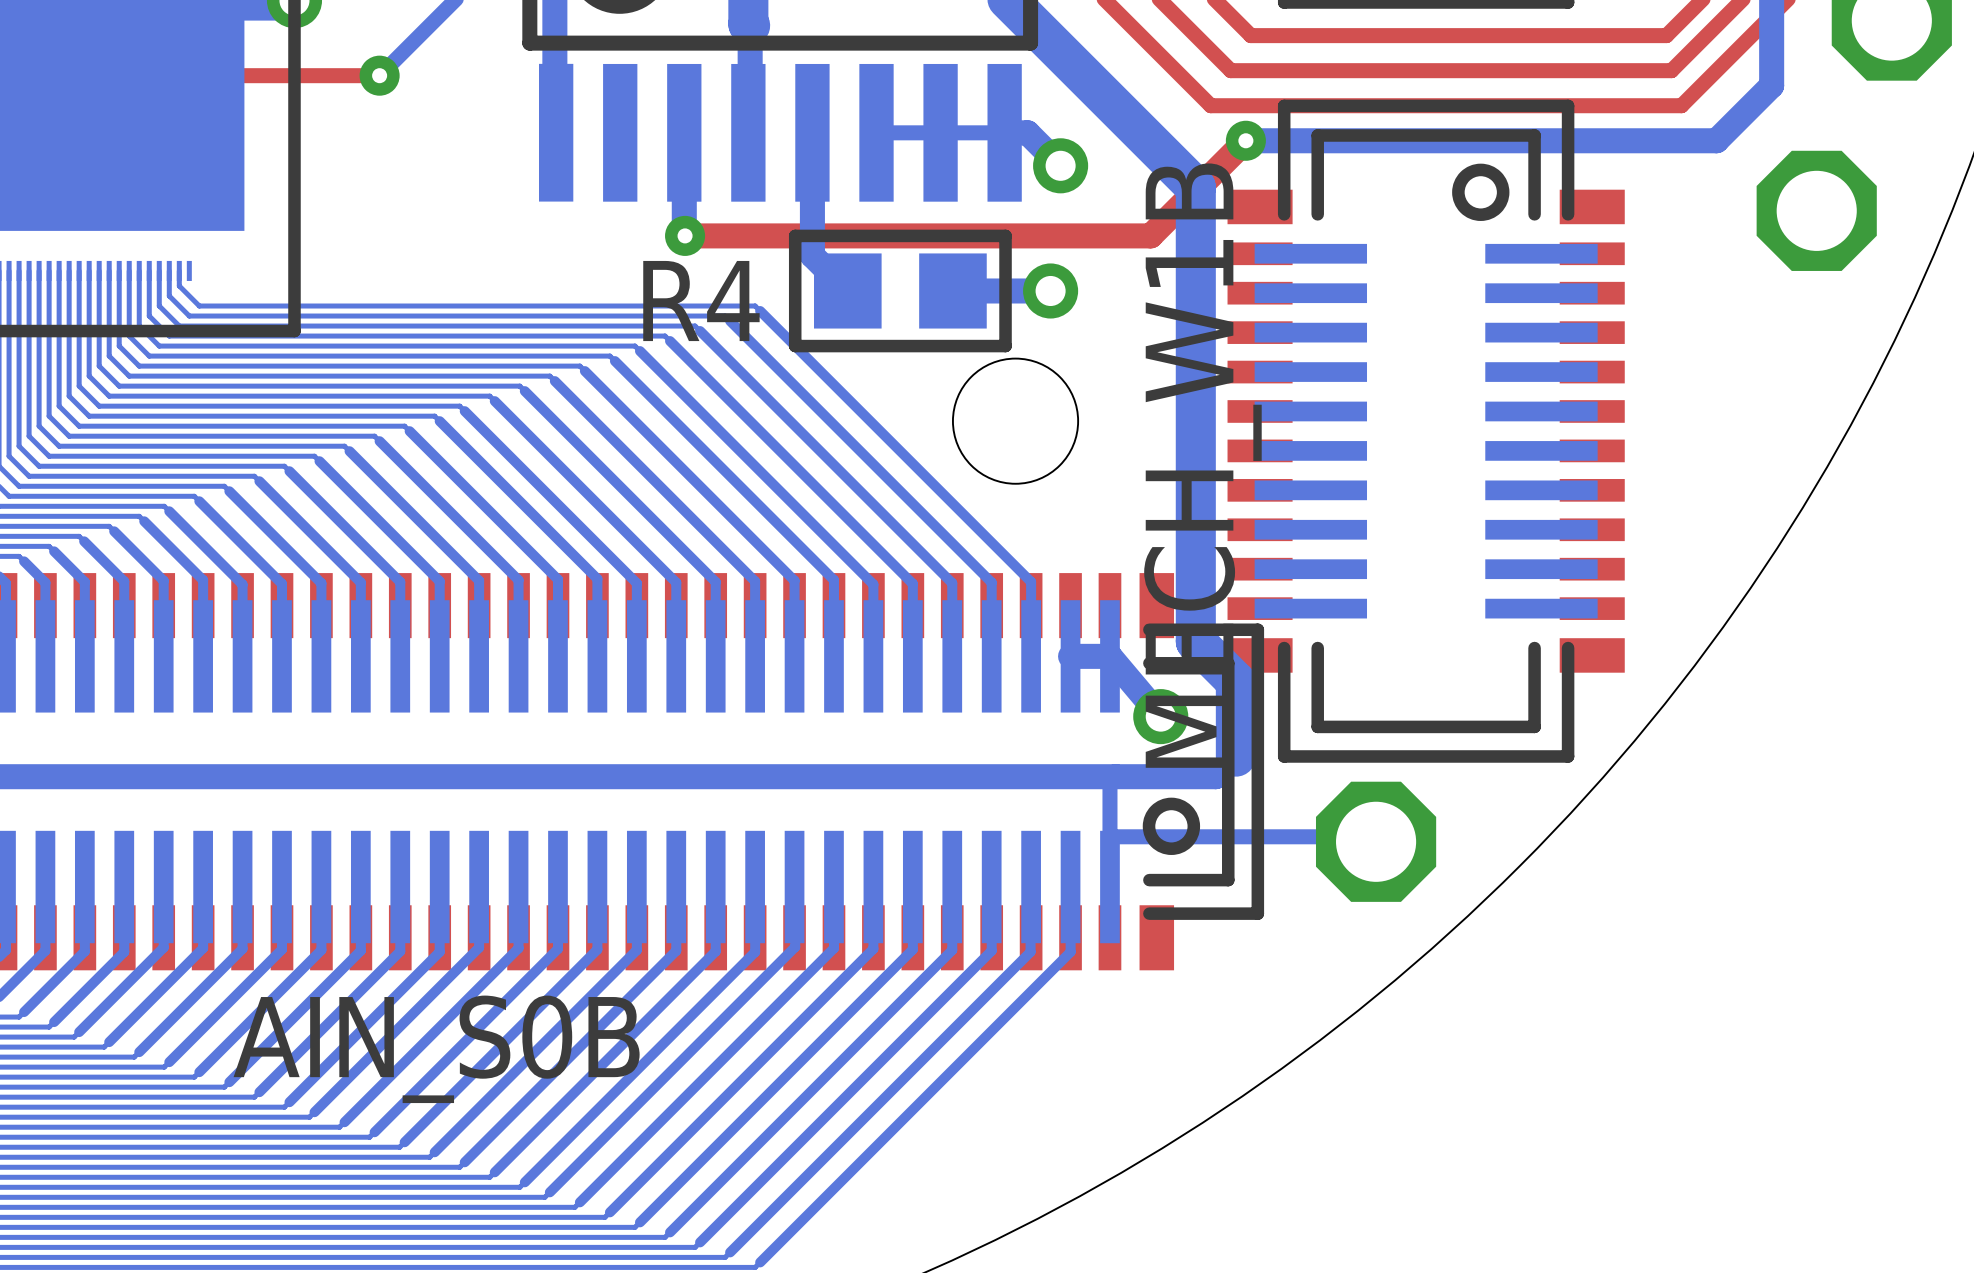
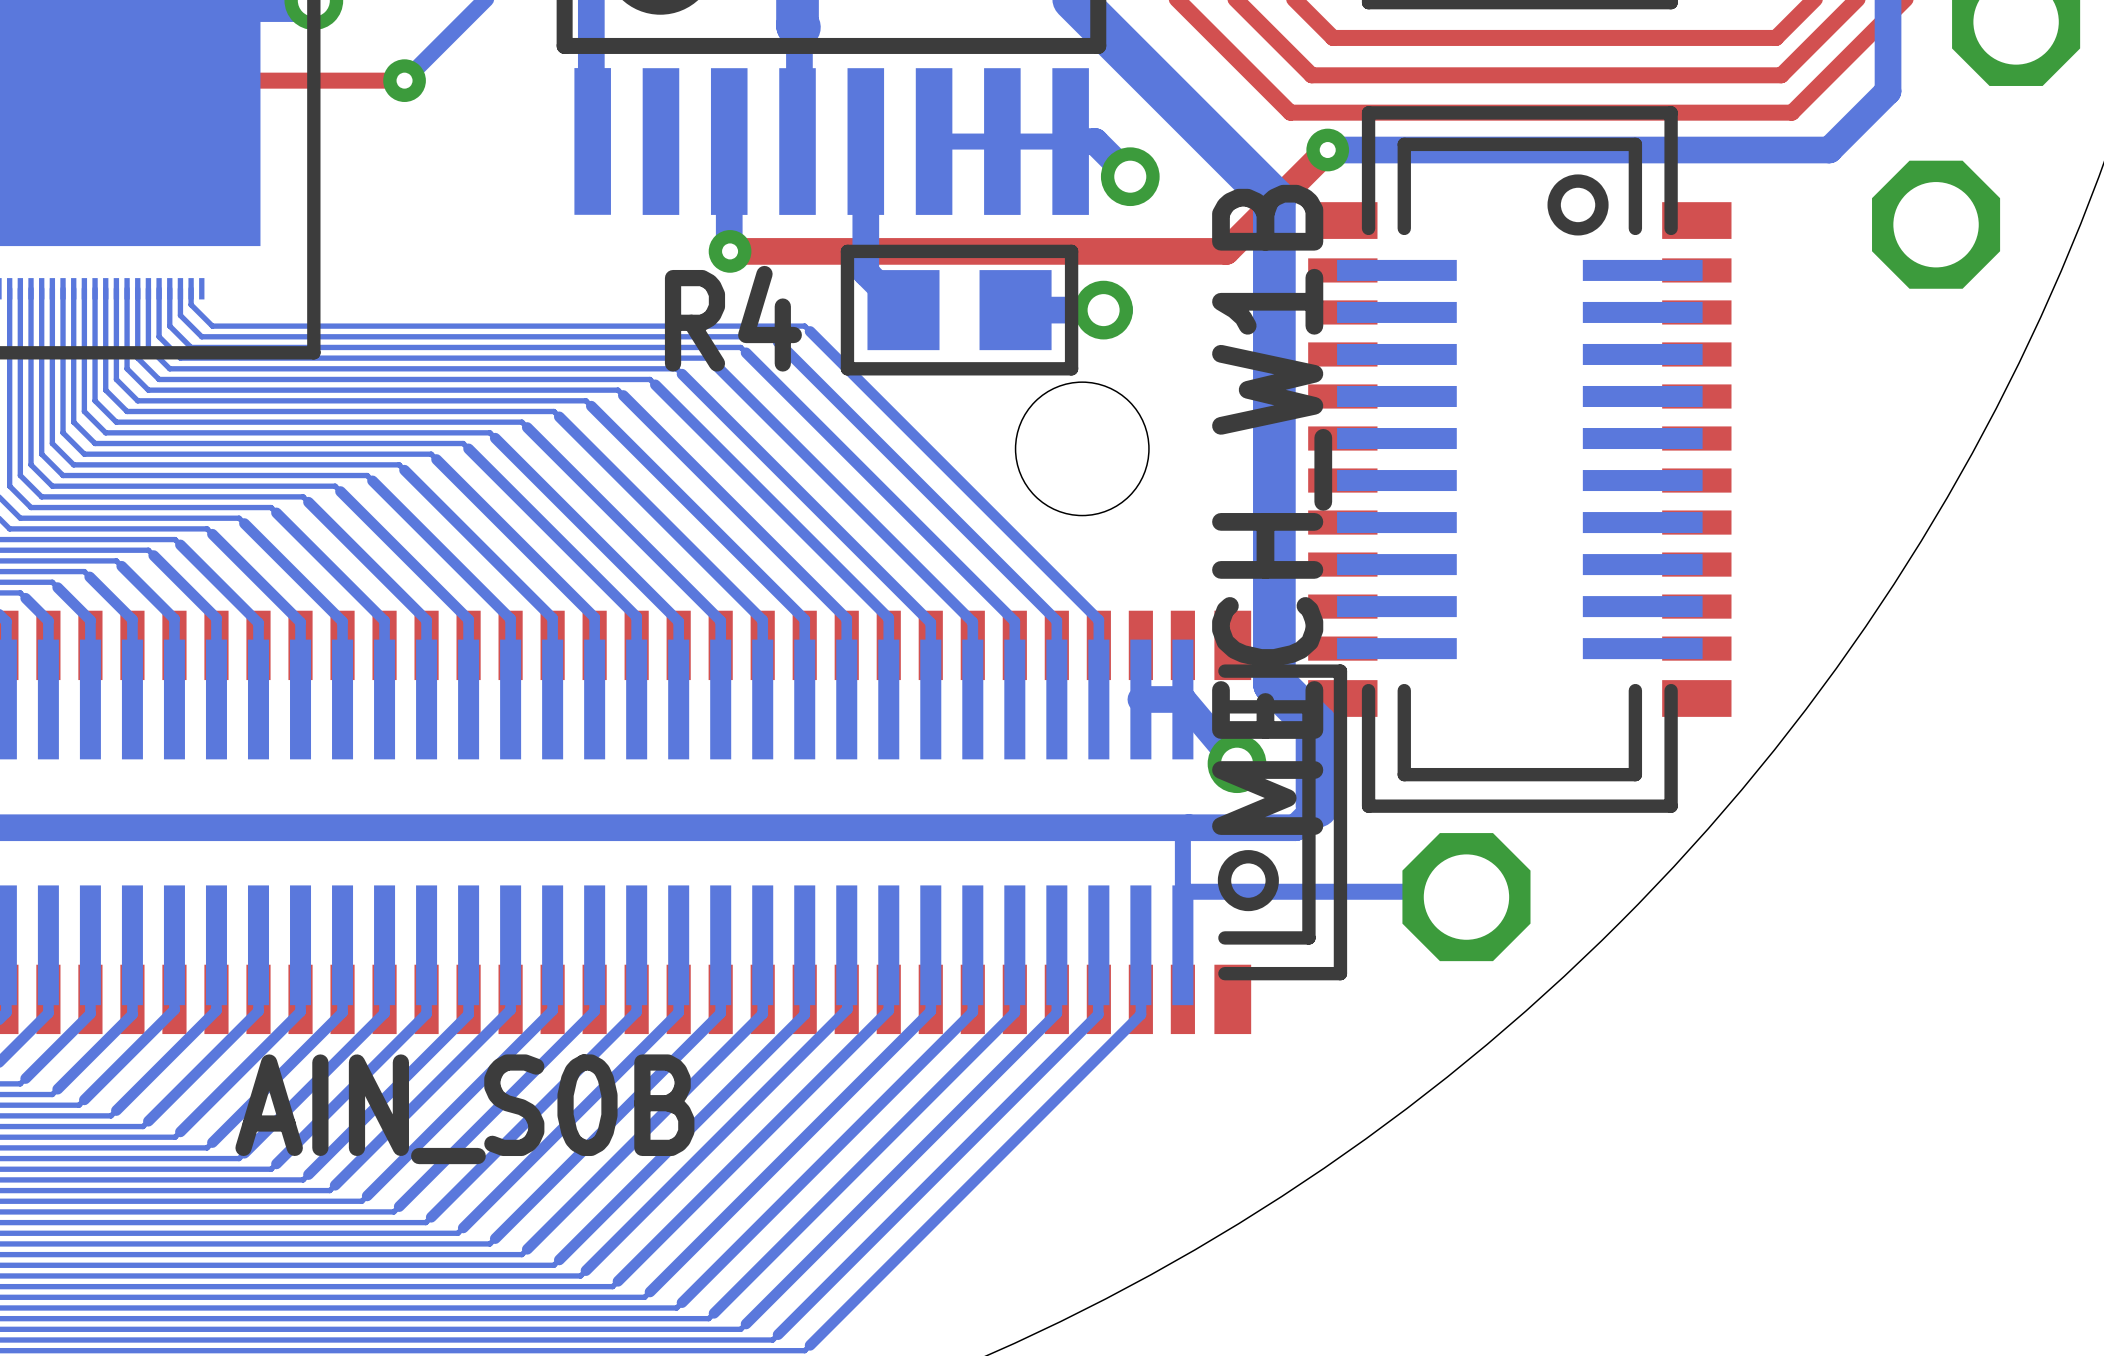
via position: (1050, 290) -> (1103, 310)

